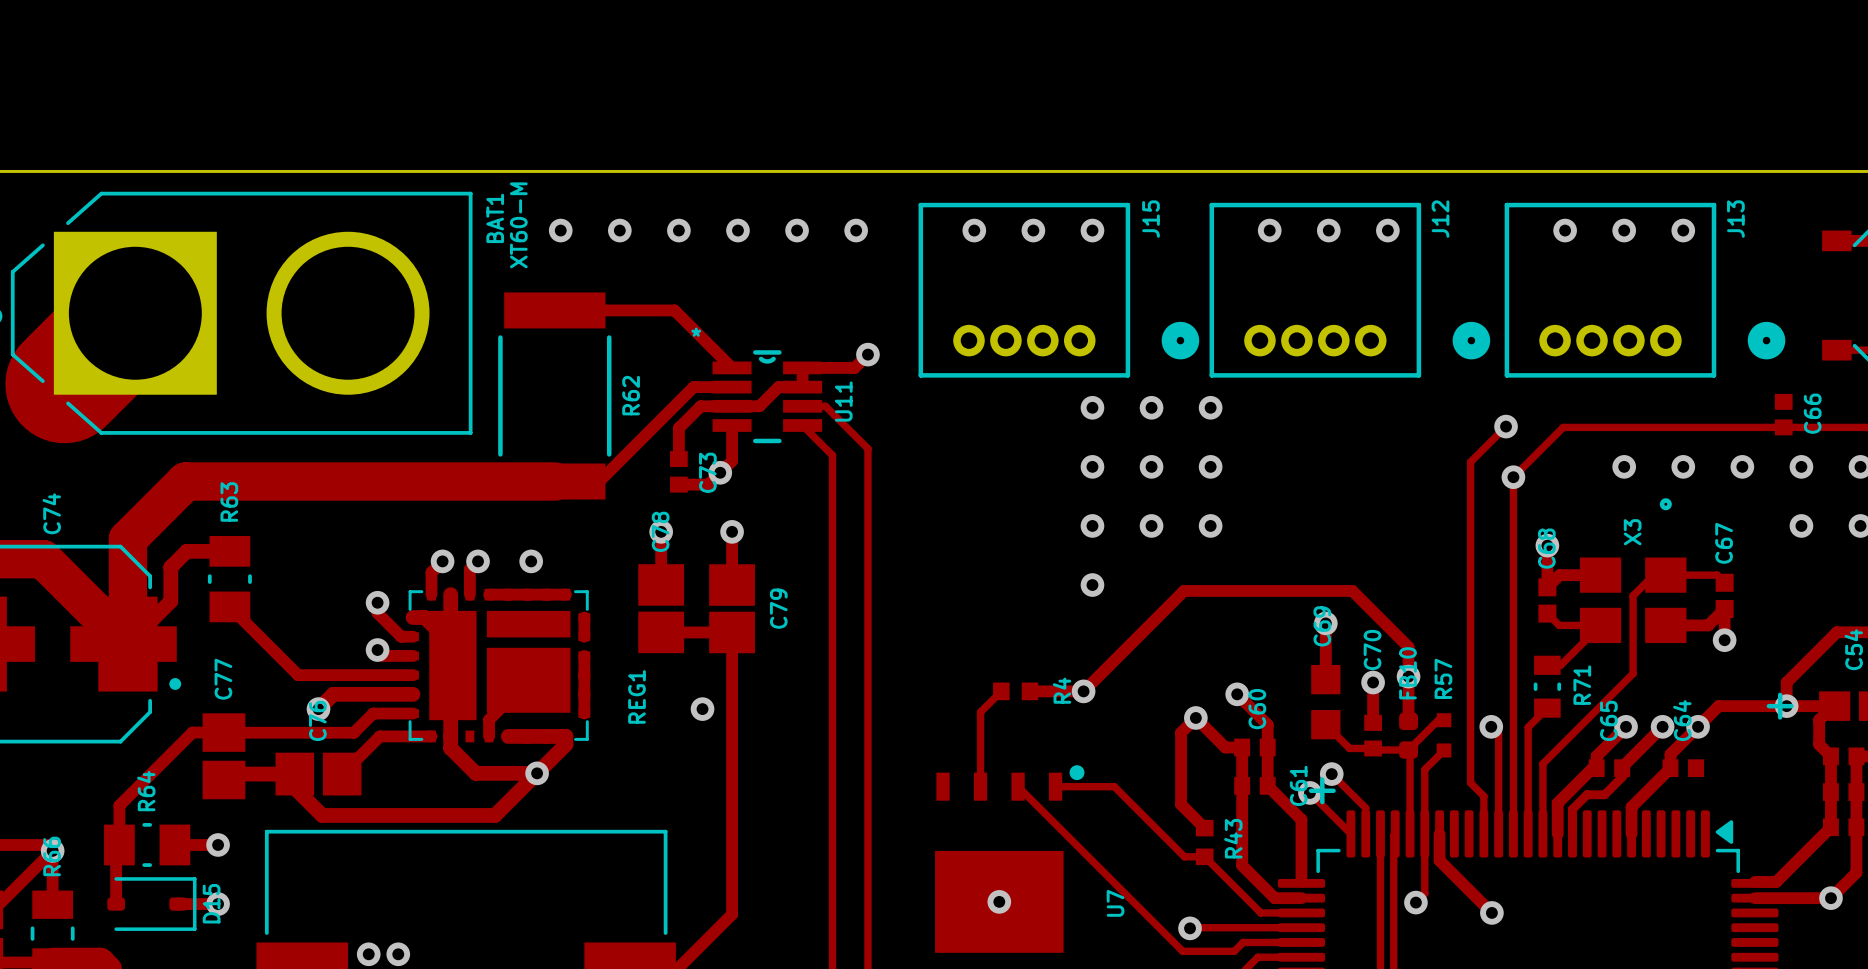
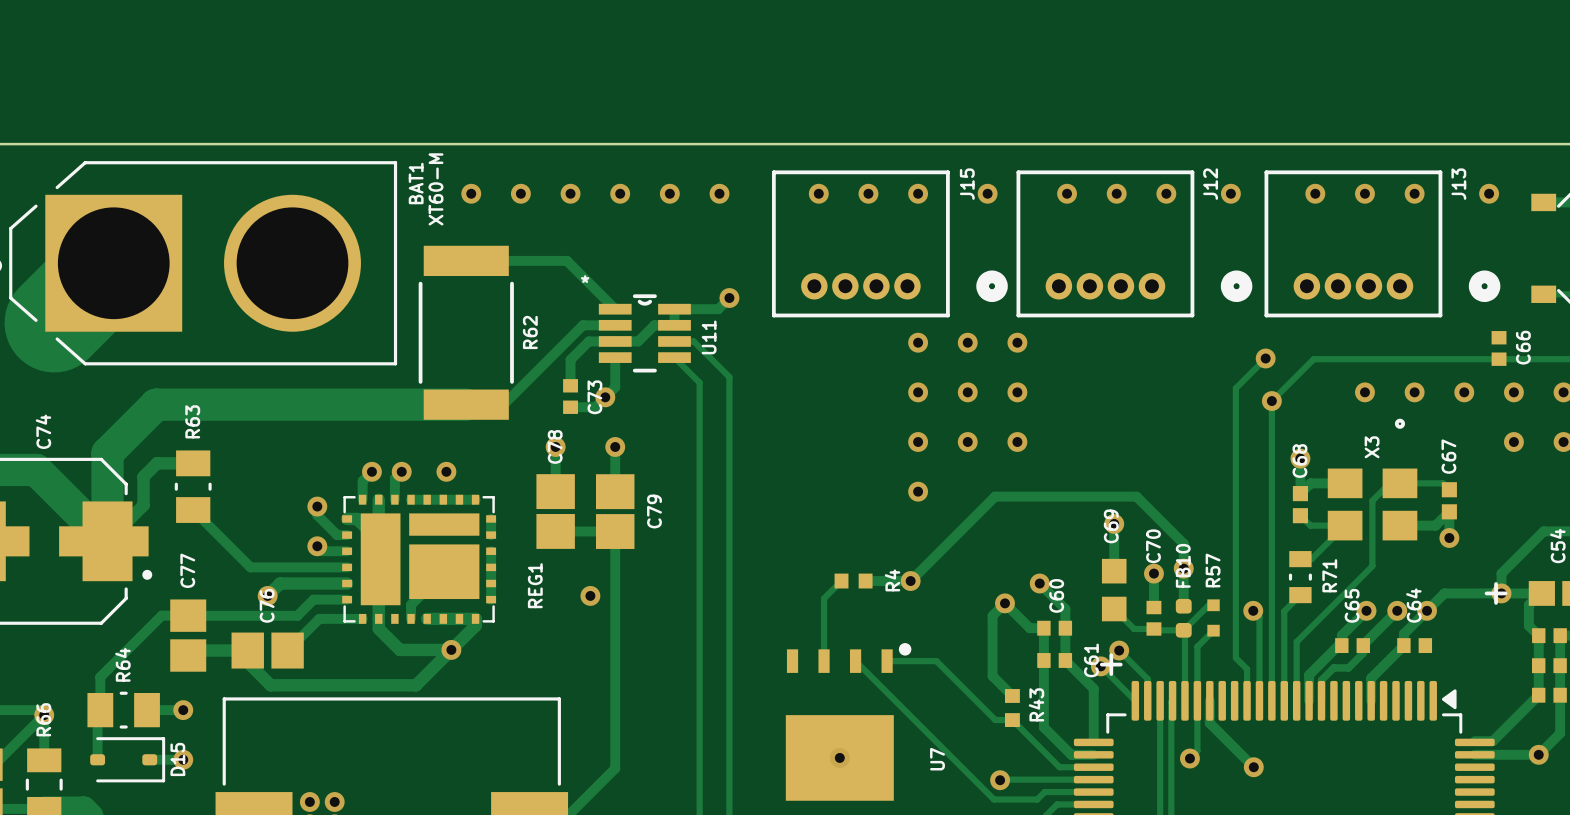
via: none -> (987, 193)
via: none -> (1230, 193)
via: none -> (1489, 193)

